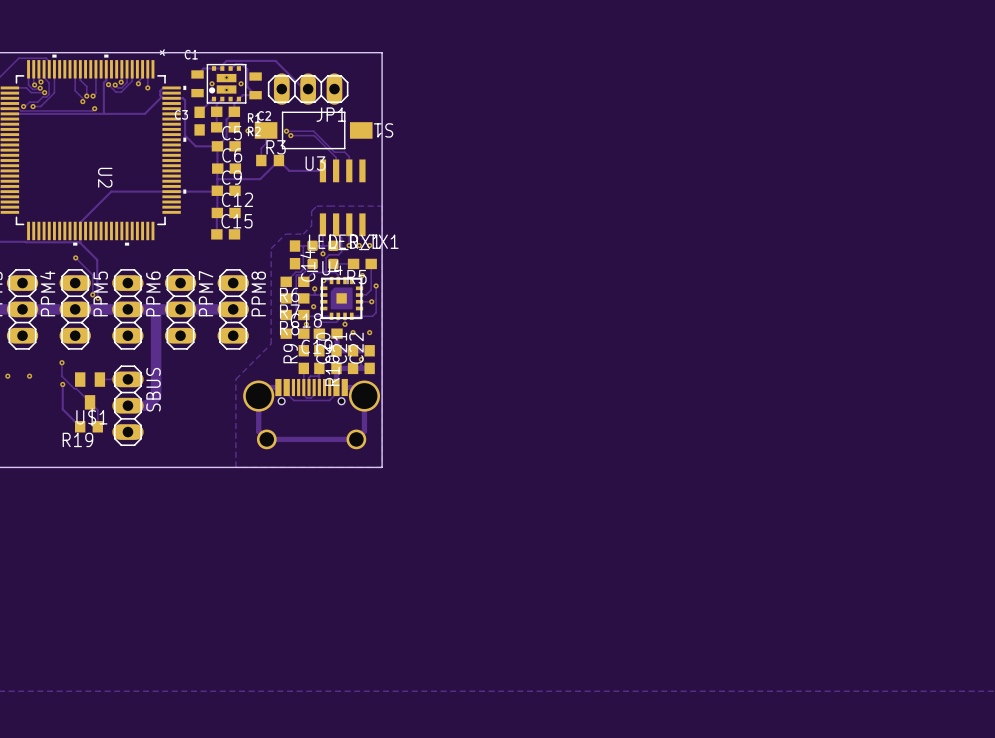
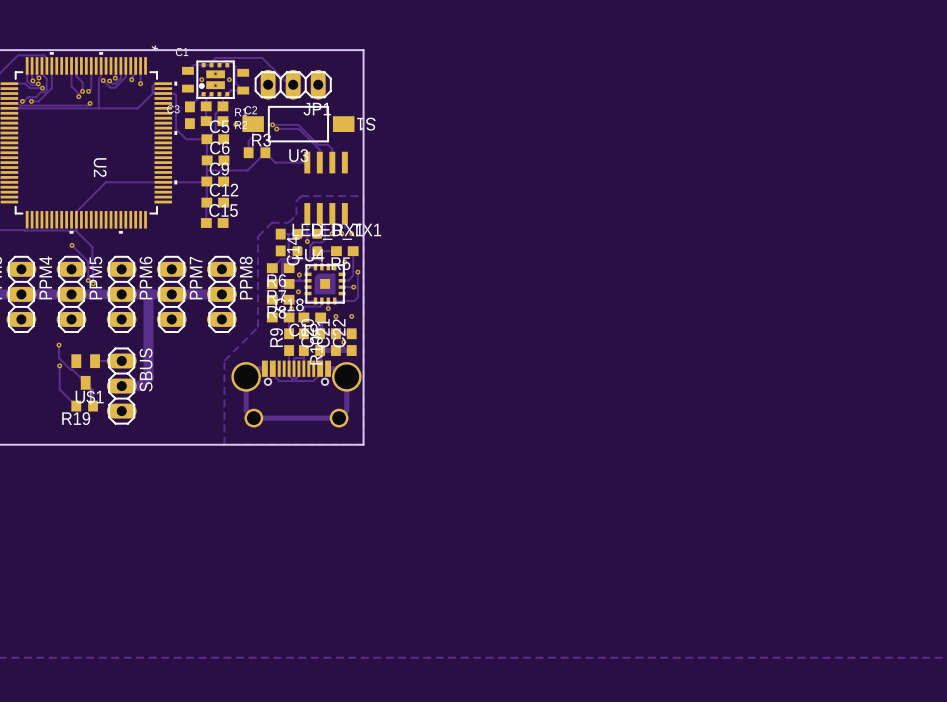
via: (7, 376) -> none
via: (29, 376) -> none

